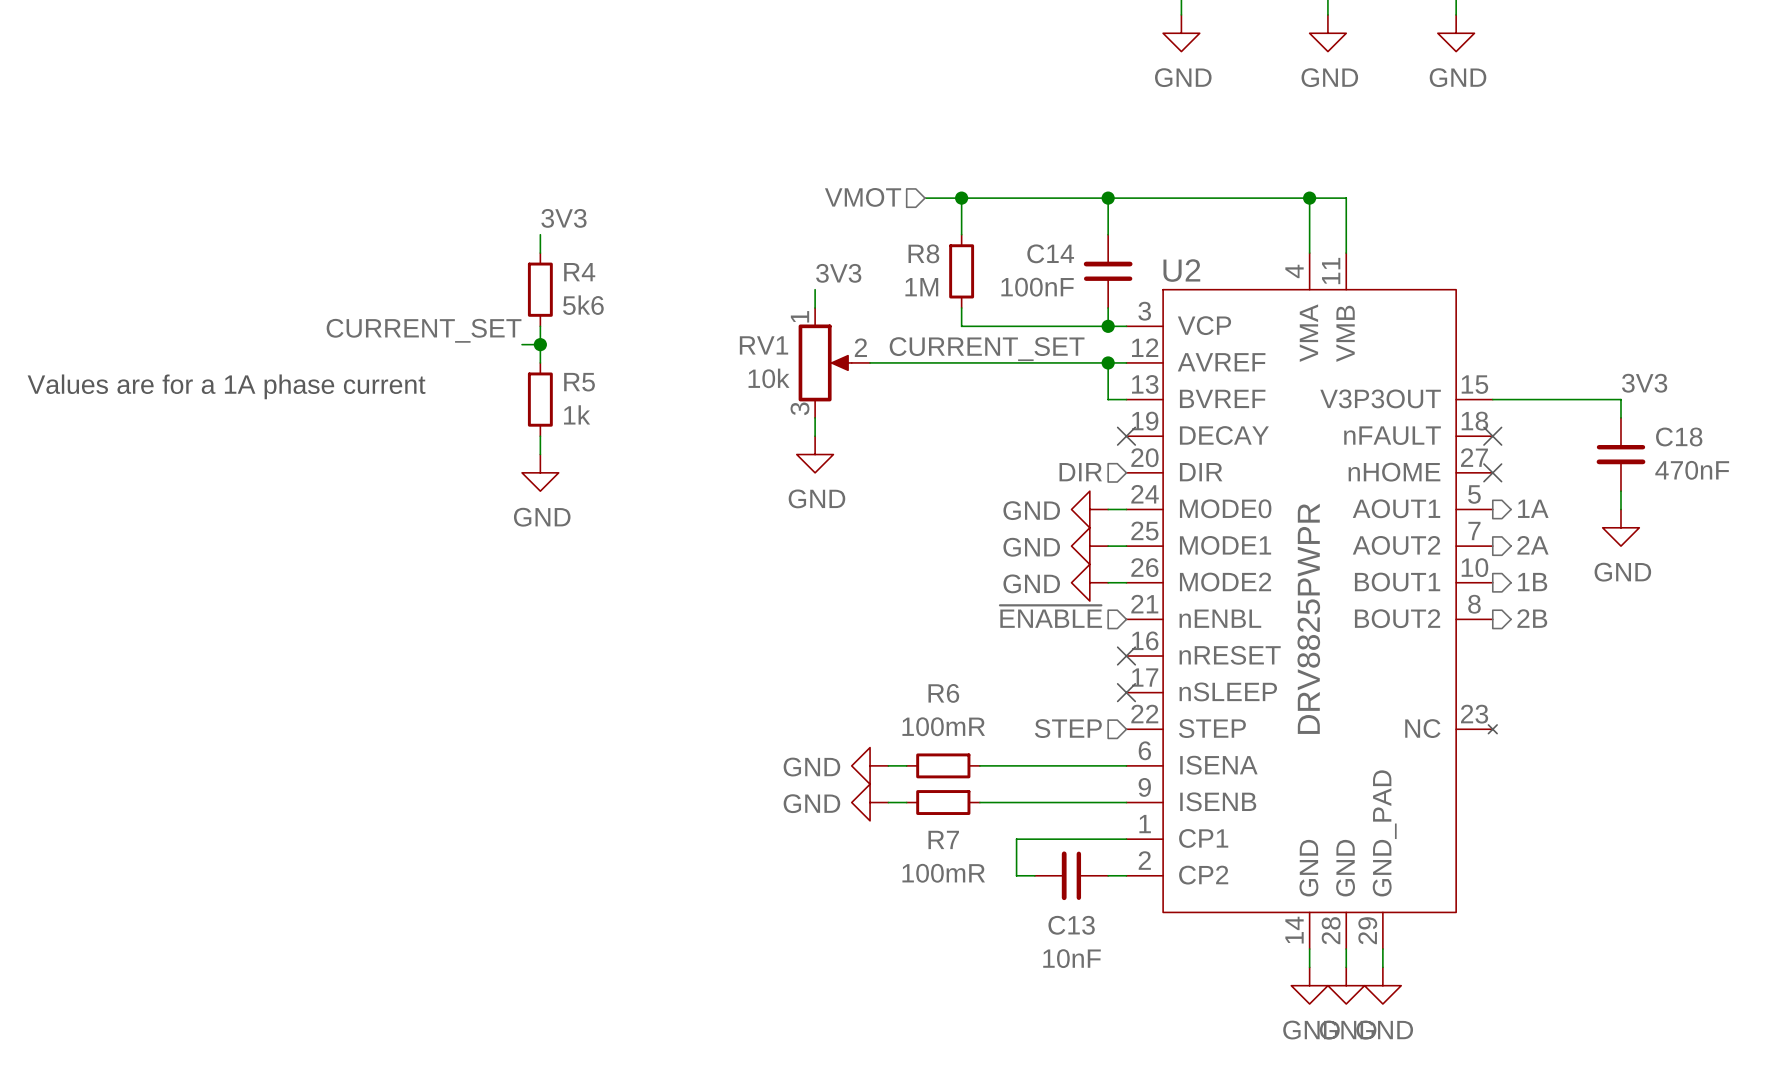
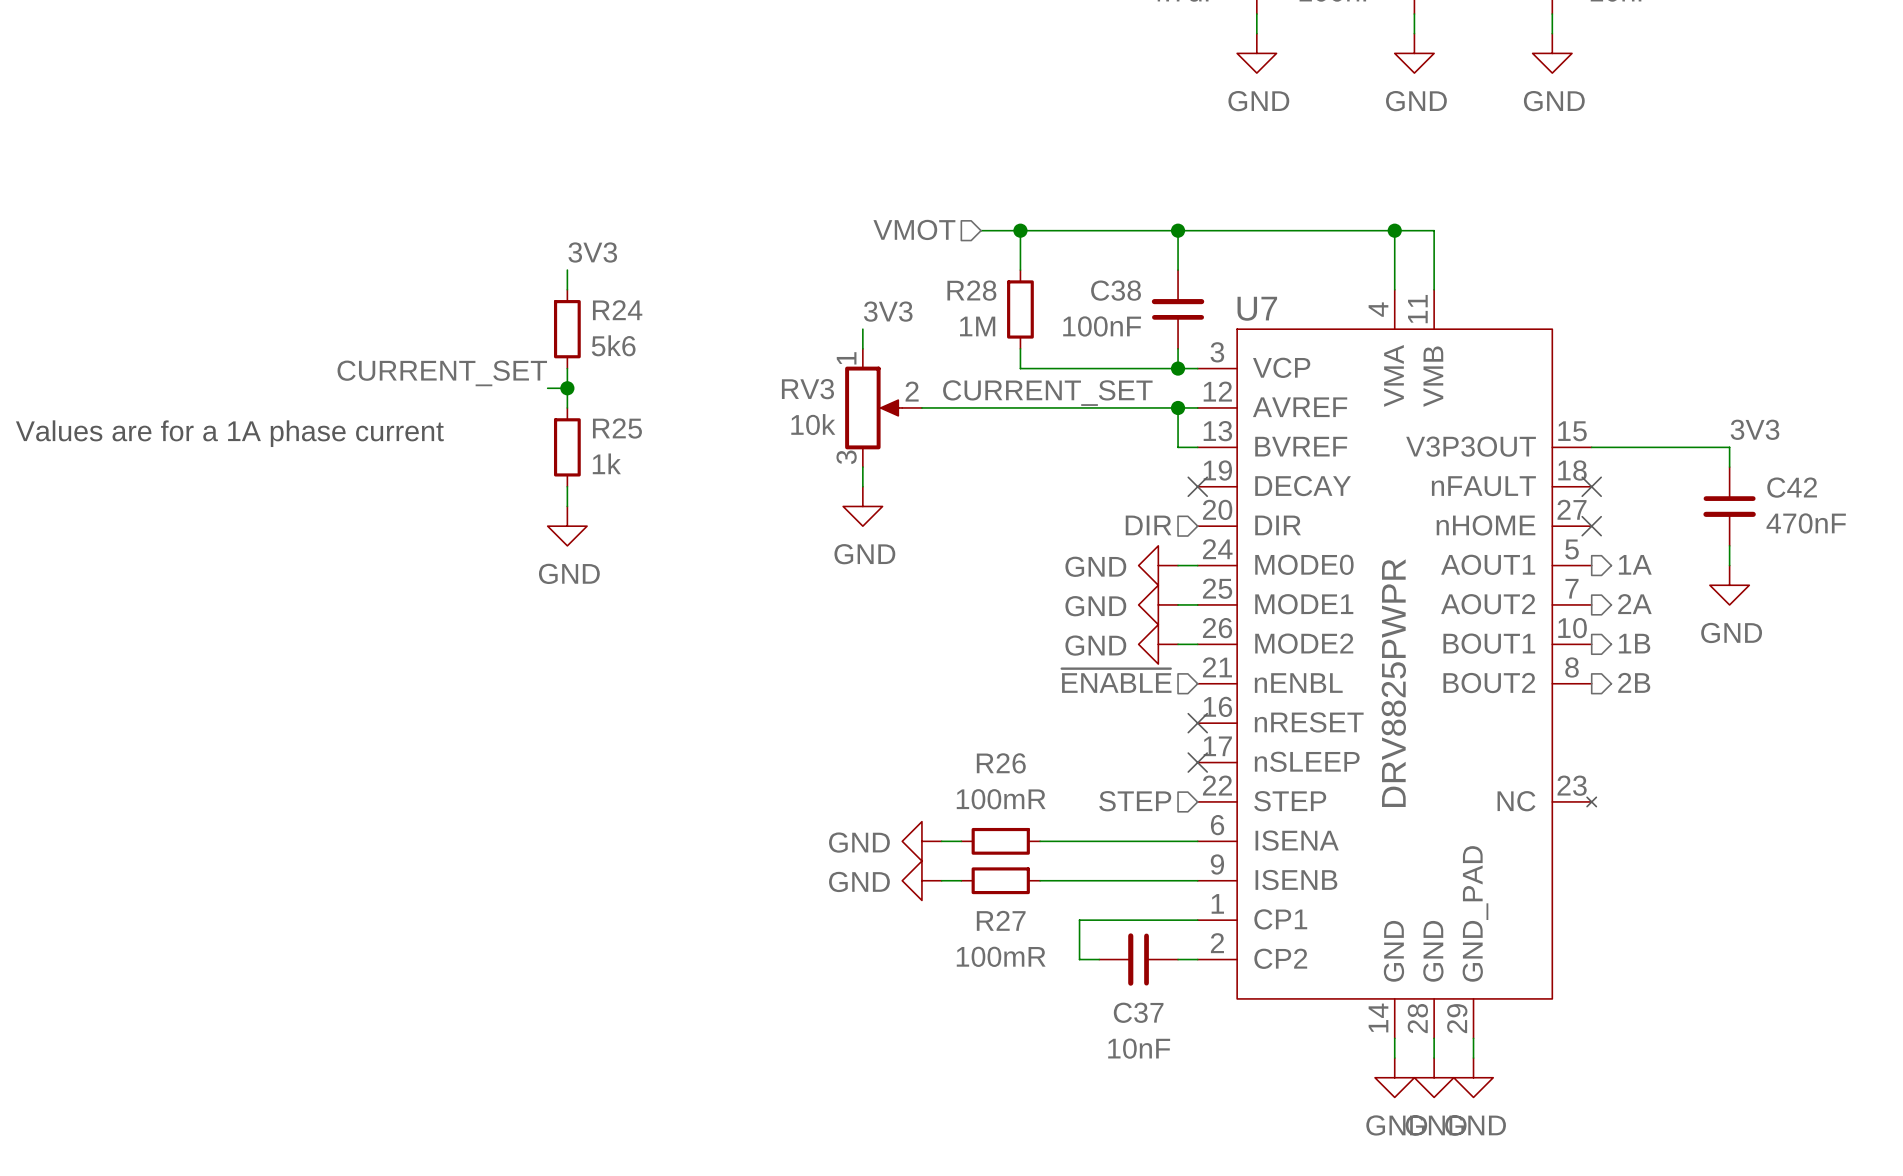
R8 name: R8 (923, 253) -> R28 (971, 290)
C14 name: C14 (1050, 253) -> C38 (1116, 290)
U2 name: U2 (1181, 270) -> U7 (1257, 308)
R4 name: R4 (579, 272) -> R24 (617, 310)
RV1 name: RV1 (764, 345) -> RV3 (807, 389)
R5 name: R5 (579, 382) -> R25 (617, 428)
C18 name: C18 (1679, 436) -> C42 (1792, 487)
R6 name: R6 (943, 693) -> R26 (1001, 763)
R7 name: R7 (943, 839) -> R27 (1001, 920)
C13 name: C13 (1071, 925) -> C37 (1138, 1012)

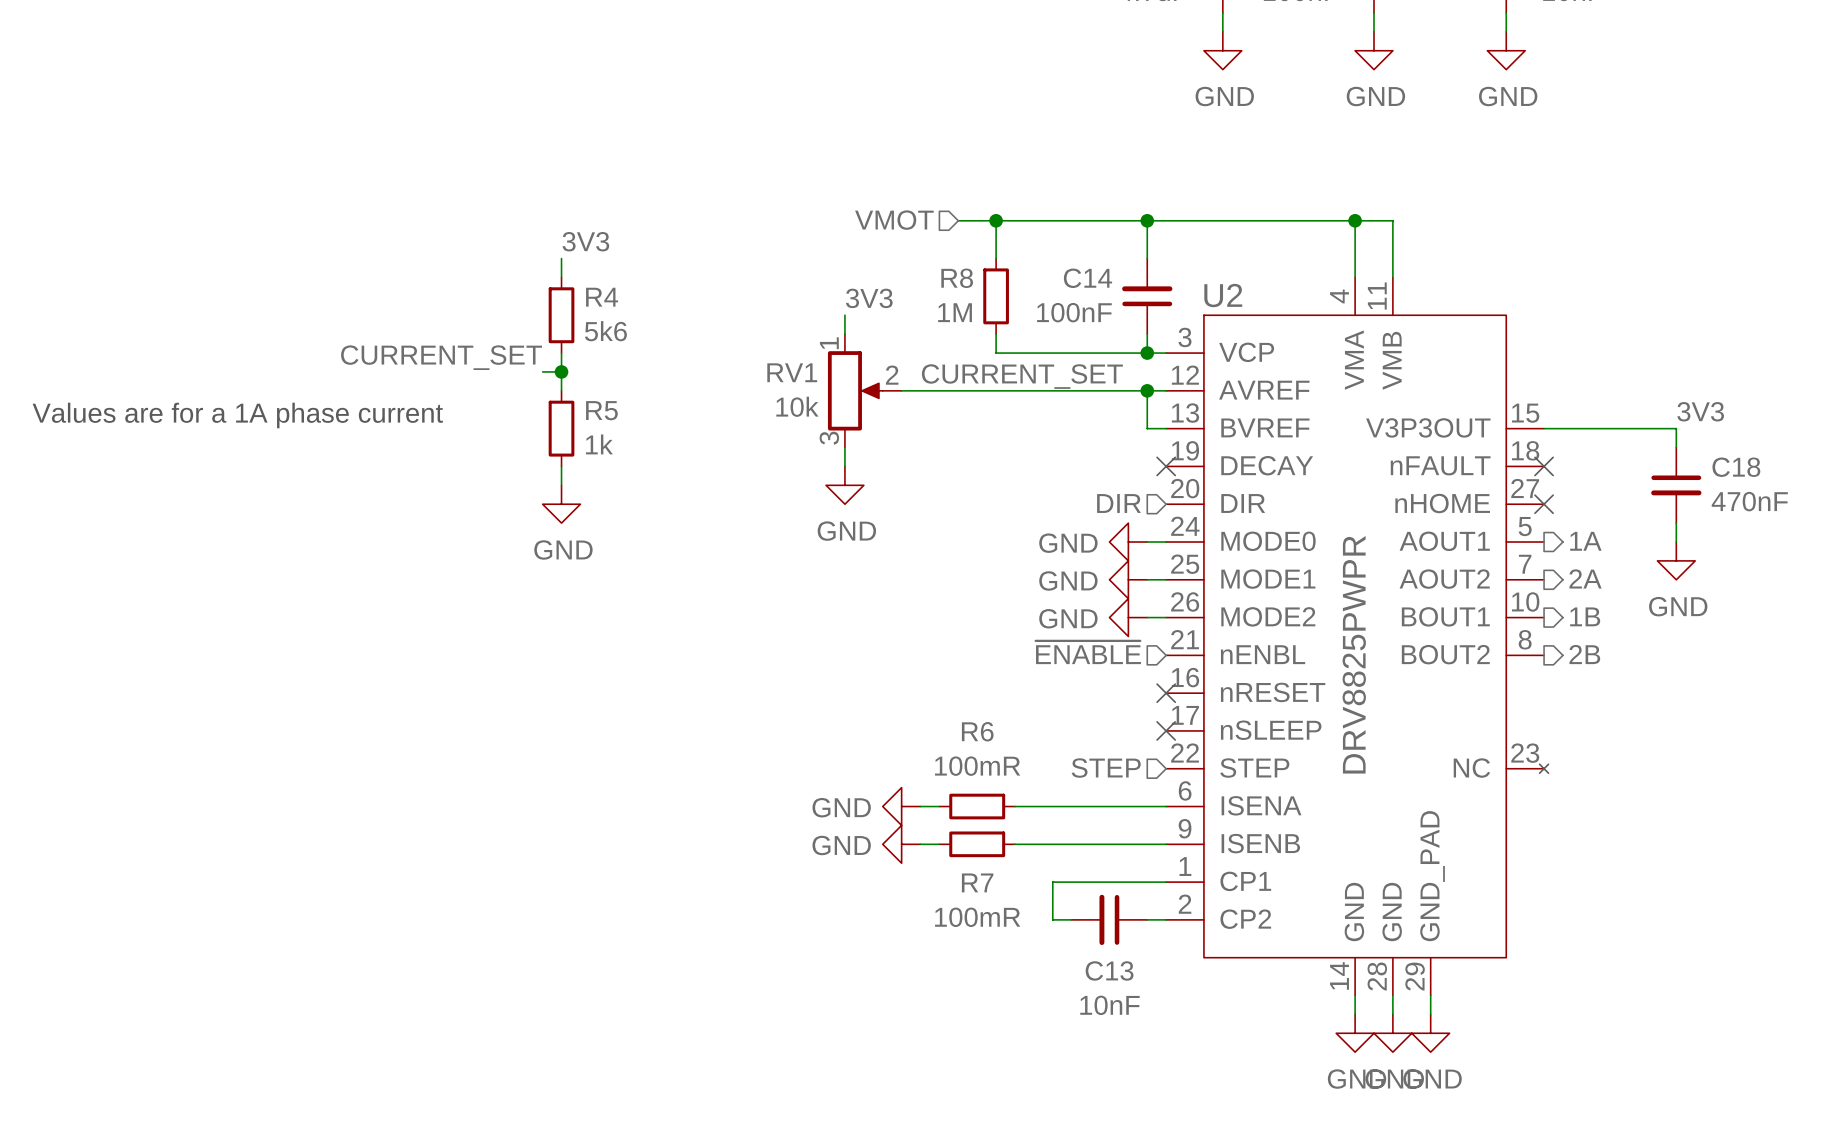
R28 name: R28 (971, 290) -> R8 (957, 278)
C38 name: C38 (1116, 290) -> C14 (1087, 278)
U7 name: U7 (1257, 308) -> U2 (1223, 295)
R24 name: R24 (617, 310) -> R4 (602, 297)
RV3 name: RV3 (807, 389) -> RV1 (792, 372)
R25 name: R25 (617, 428) -> R5 (601, 410)
C42 name: C42 (1792, 487) -> C18 (1736, 467)
R26 name: R26 (1001, 763) -> R6 (977, 731)
R27 name: R27 (1001, 920) -> R7 (977, 882)
C37 name: C37 (1138, 1012) -> C13 (1109, 970)

